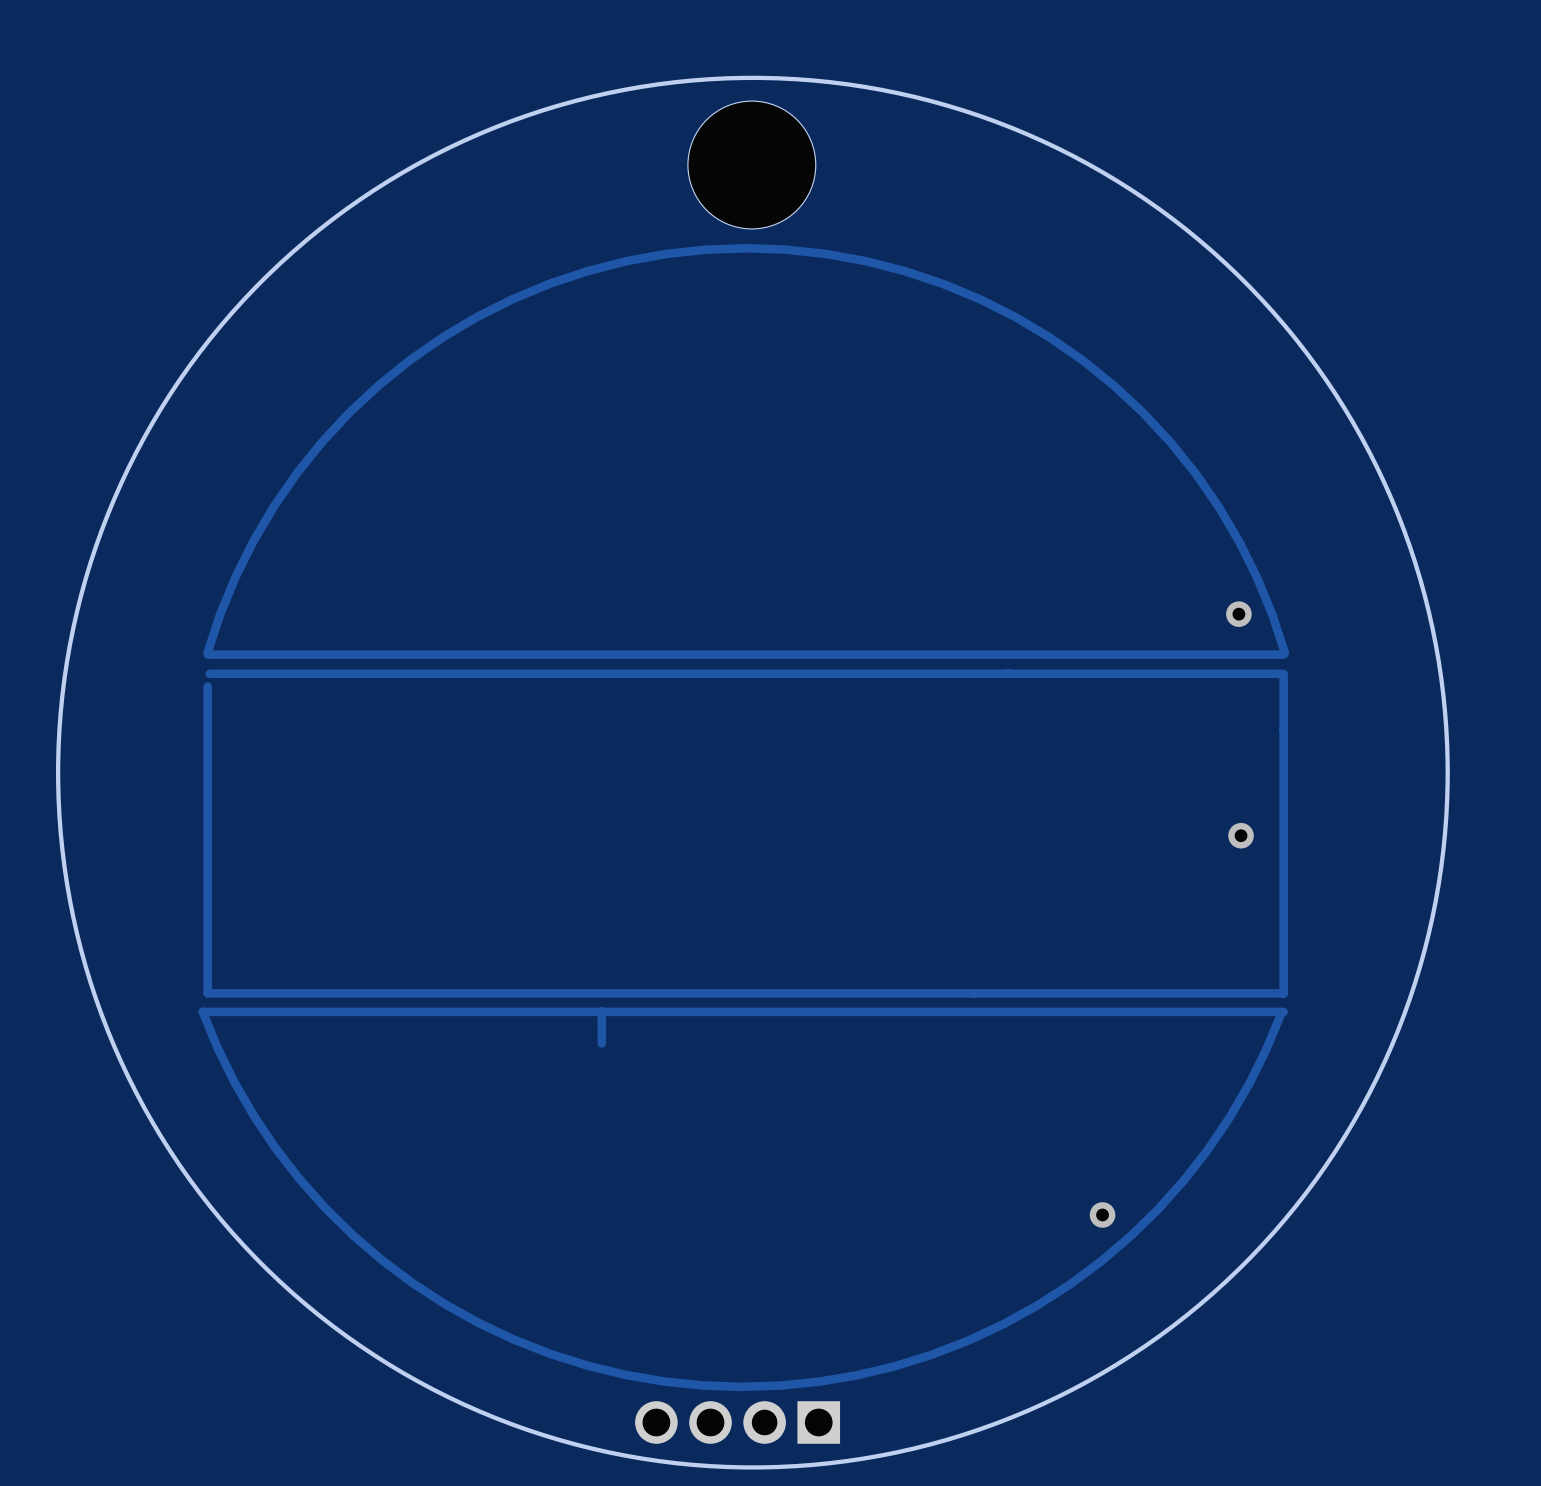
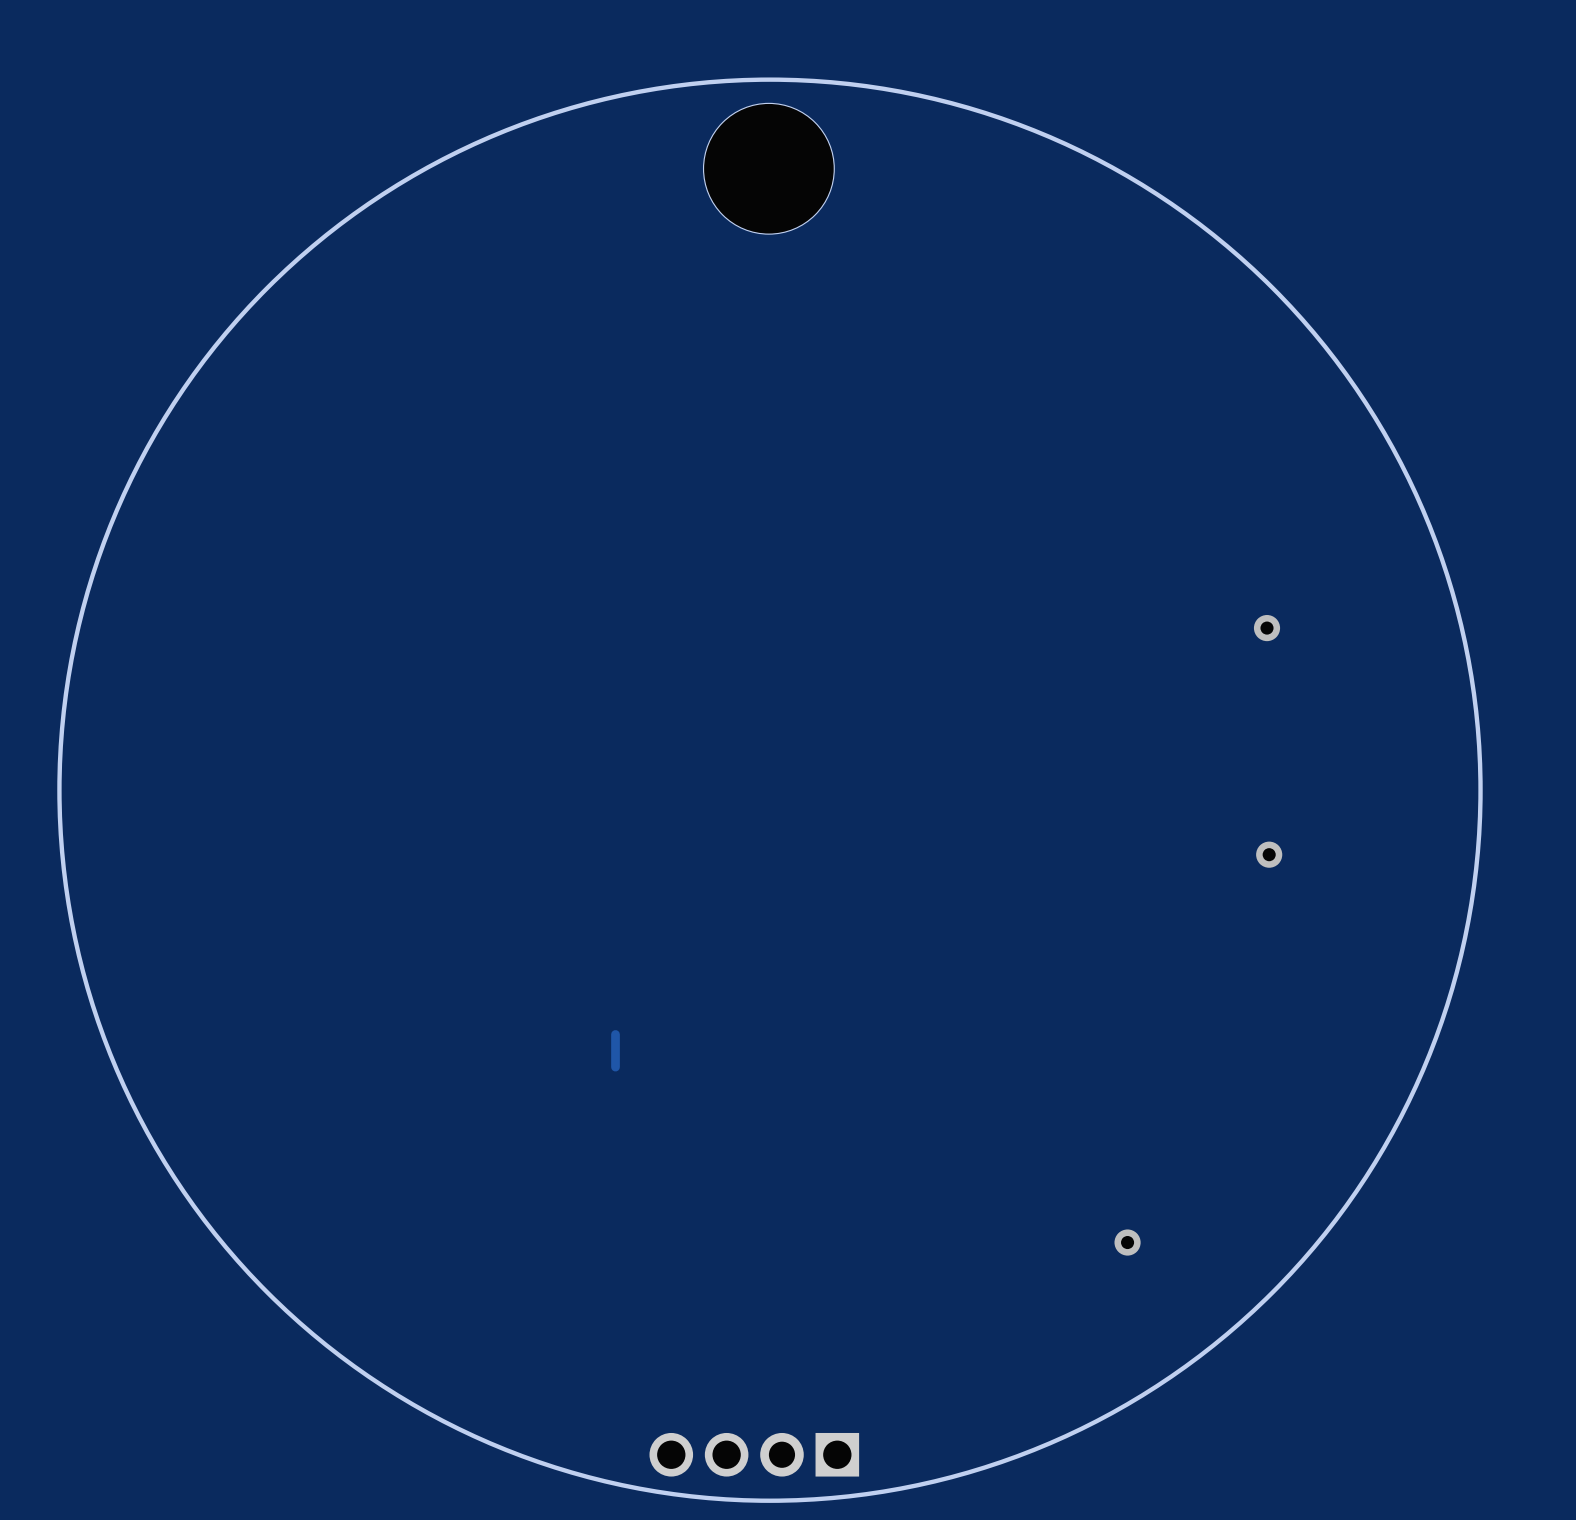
track: (207, 652) (235, 577) (273, 506) (296, 473) (349, 412) (409, 360) (477, 316) (513, 298) (588, 270) (666, 253) (746, 248) (826, 254) (904, 271) (942, 283) (1015, 317) (1083, 360) (1143, 413) (1196, 474) (1239, 541) (1272, 614) (1284, 652) -> none
track: (1283, 654) (207, 654) -> none
track: (1283, 673) (209, 673) -> none
track: (1283, 675) (1283, 993) (207, 993) (207, 686) -> none
track: (1283, 1011) (202, 1011) (234, 1082) (275, 1148) (325, 1207) (352, 1235) (413, 1283) (445, 1304) (514, 1340) (588, 1365) (664, 1381) (741, 1386) (818, 1381) (857, 1375) (931, 1354) (1003, 1324) (1069, 1284) (1130, 1236) (1184, 1180) (1207, 1149) (1249, 1084) (1281, 1013) -> none

